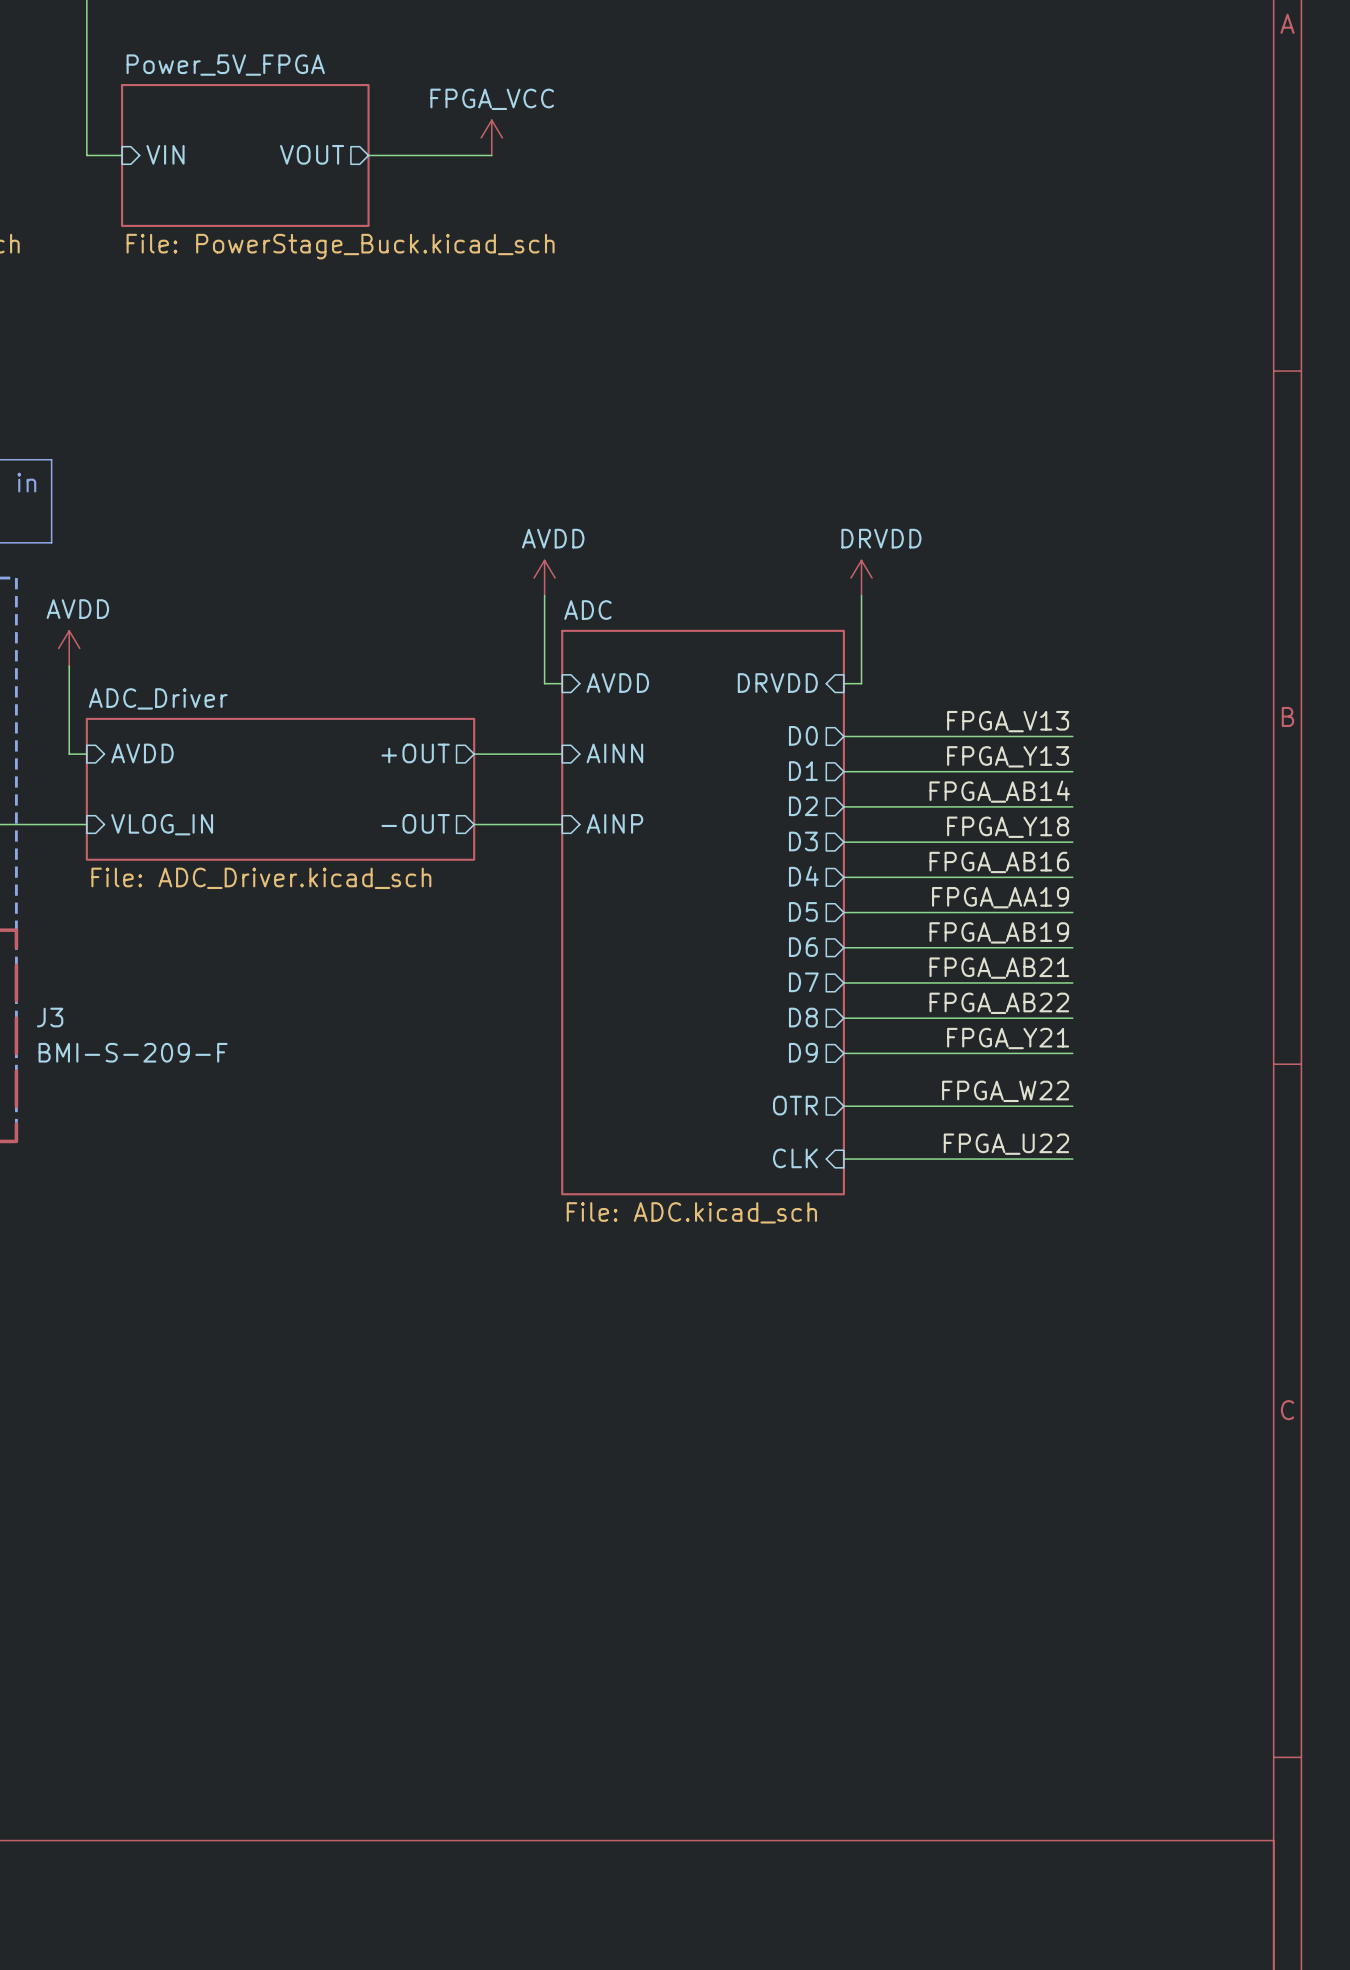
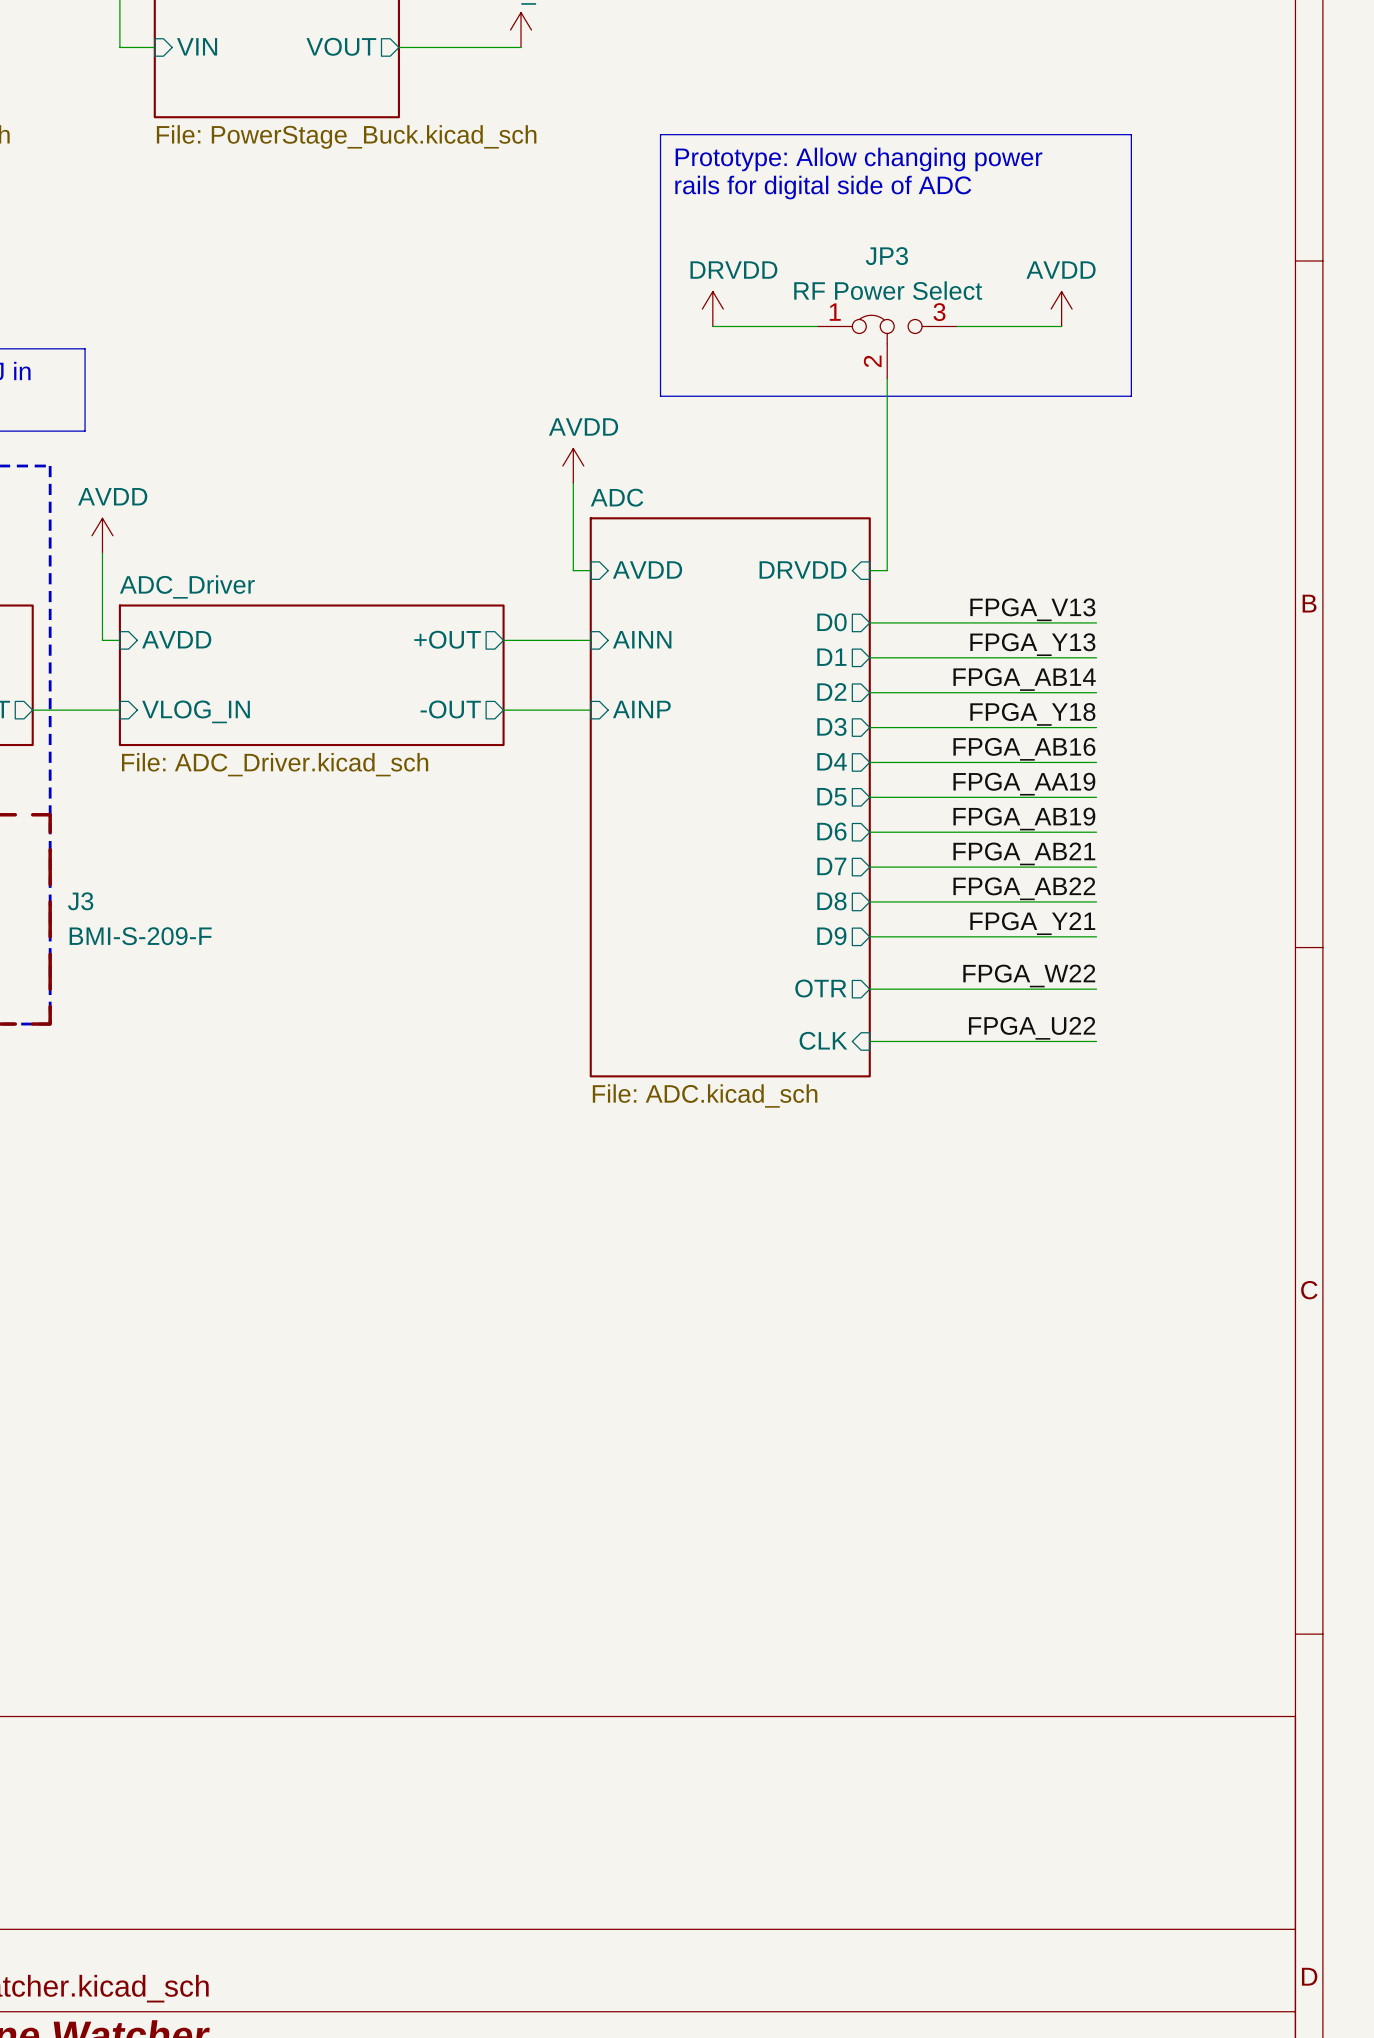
line: none -> (660, 134) (1131, 134) (1131, 396) (660, 396) (660, 134)
text: none -> Prototype: Allow changing power (859, 159)
text: none -> rails for digital side of ADC (823, 187)
power symbol: none -> AVDD (1061, 309)
wire: none -> (712, 326) (817, 326)
wire: none -> (956, 326) (1061, 326)
JP3: none -> RF Power Select (887, 347)
wire: none -> (887, 378) (887, 483)
power symbol position: DRVDD (861, 578) -> DRVDD (712, 309)

